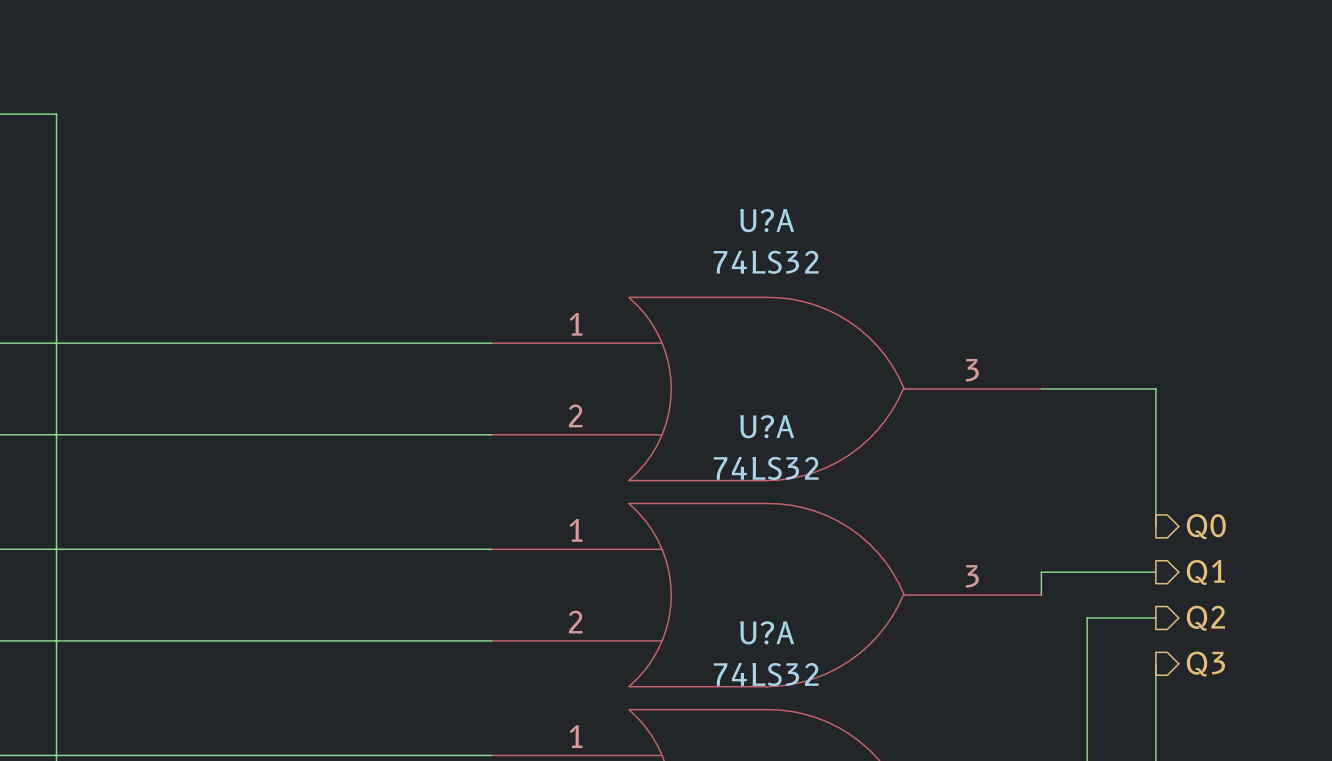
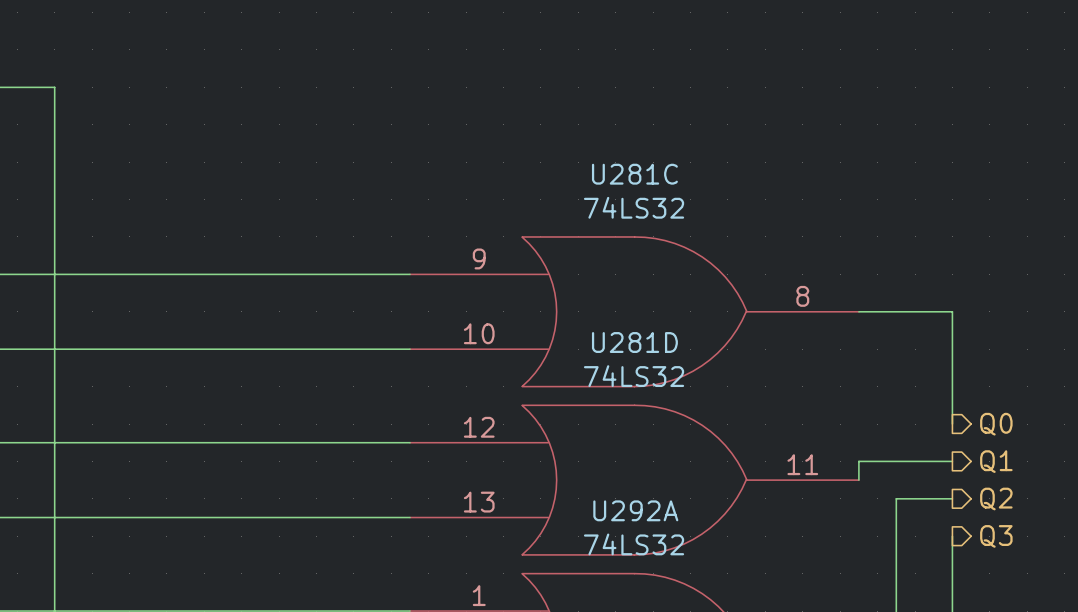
U?A name: U?A (767, 220) -> U281C (634, 174)
U?A pin number: 1 (576, 324) -> 9 (479, 258)
U?A pin number: 3 (972, 370) -> 8 (802, 296)
U?A pin number: 2 (575, 415) -> 10 (479, 333)
U?A name: U?A (767, 426) -> U281D (634, 342)
U?A pin number: 1 (576, 530) -> 12 (479, 427)
U?A pin number: 3 (972, 576) -> 11 (802, 464)
U?A pin number: 2 (575, 622) -> 13 (479, 502)
U?A name: U?A (767, 632) -> U292A (635, 510)

